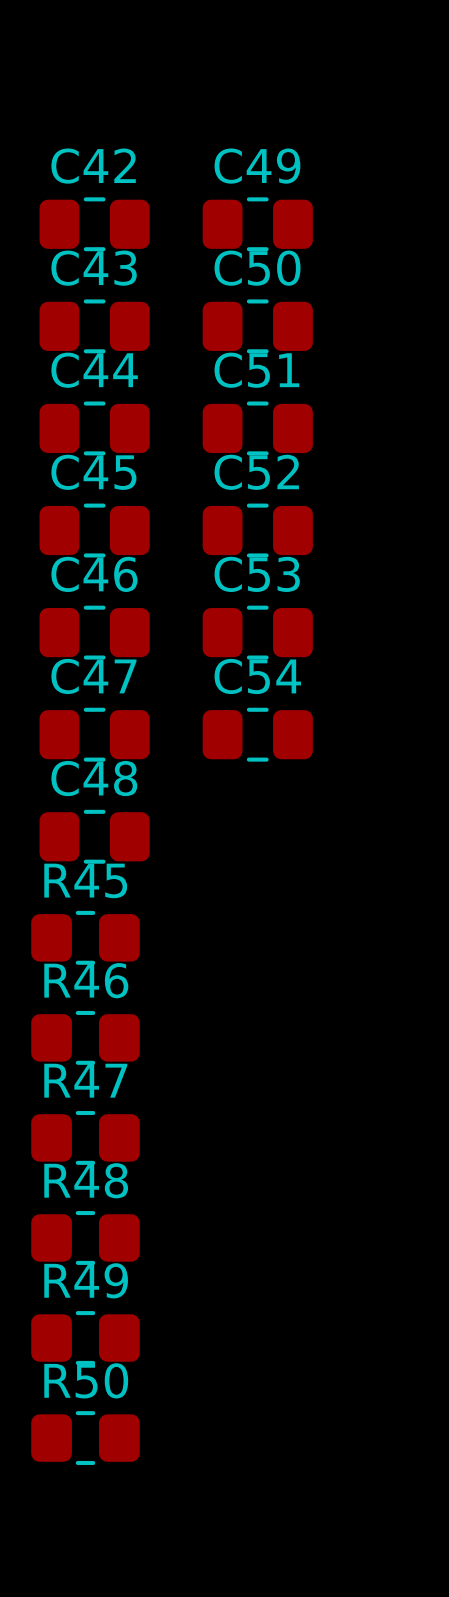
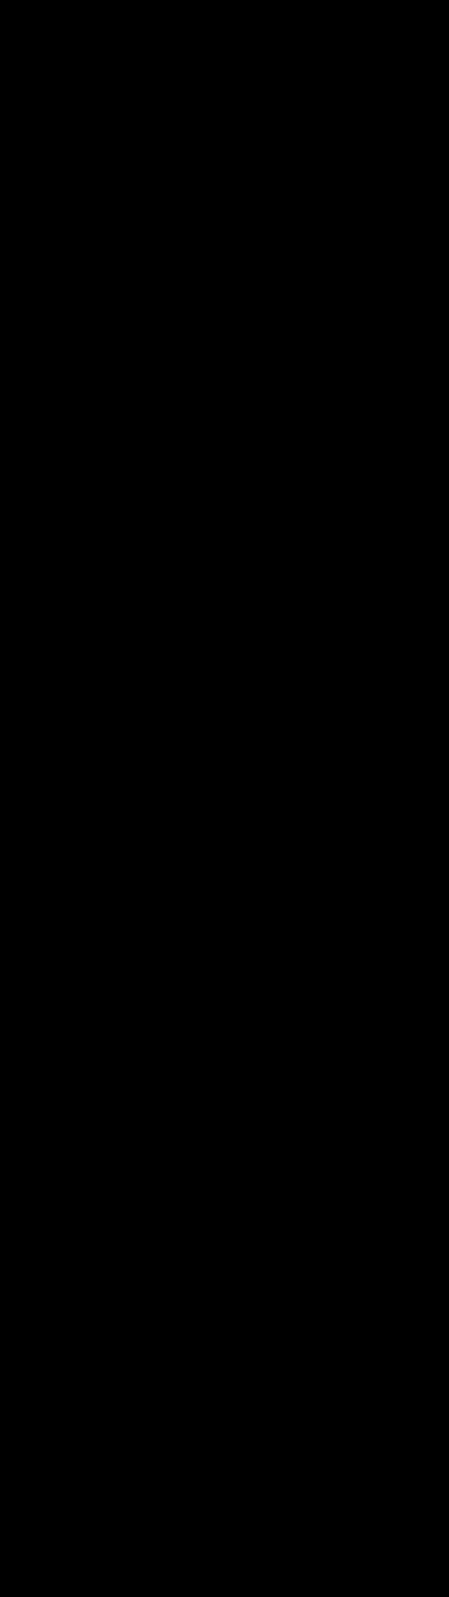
C42: (94, 224) -> none
C49: (257, 224) -> none
C43: (94, 326) -> none
C50: (257, 326) -> none
C44: (94, 428) -> none
C51: (257, 428) -> none
C45: (94, 530) -> none
C52: (257, 530) -> none
C46: (94, 632) -> none
C53: (257, 632) -> none
C47: (94, 734) -> none
C54: (257, 734) -> none
C48: (94, 836) -> none
R45: (85, 937) -> none
R46: (85, 1037) -> none
R47: (85, 1137) -> none
R48: (85, 1237) -> none
R49: (85, 1338) -> none
R50: (85, 1438) -> none

